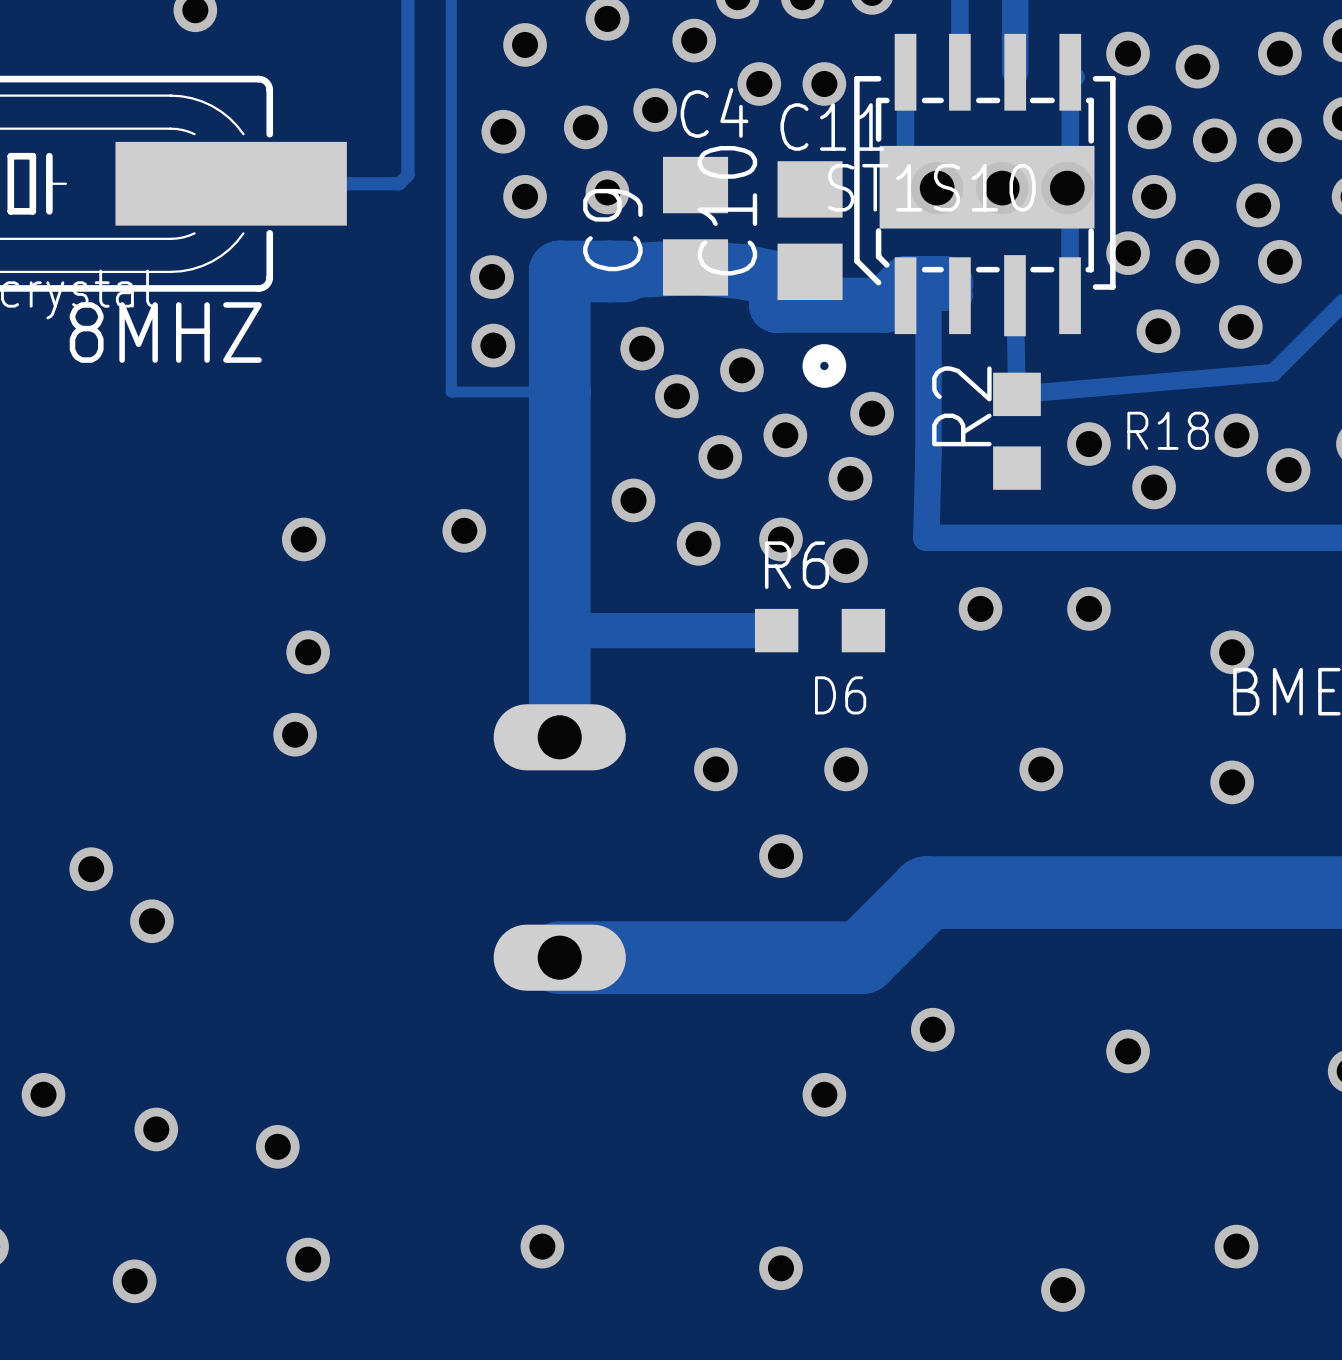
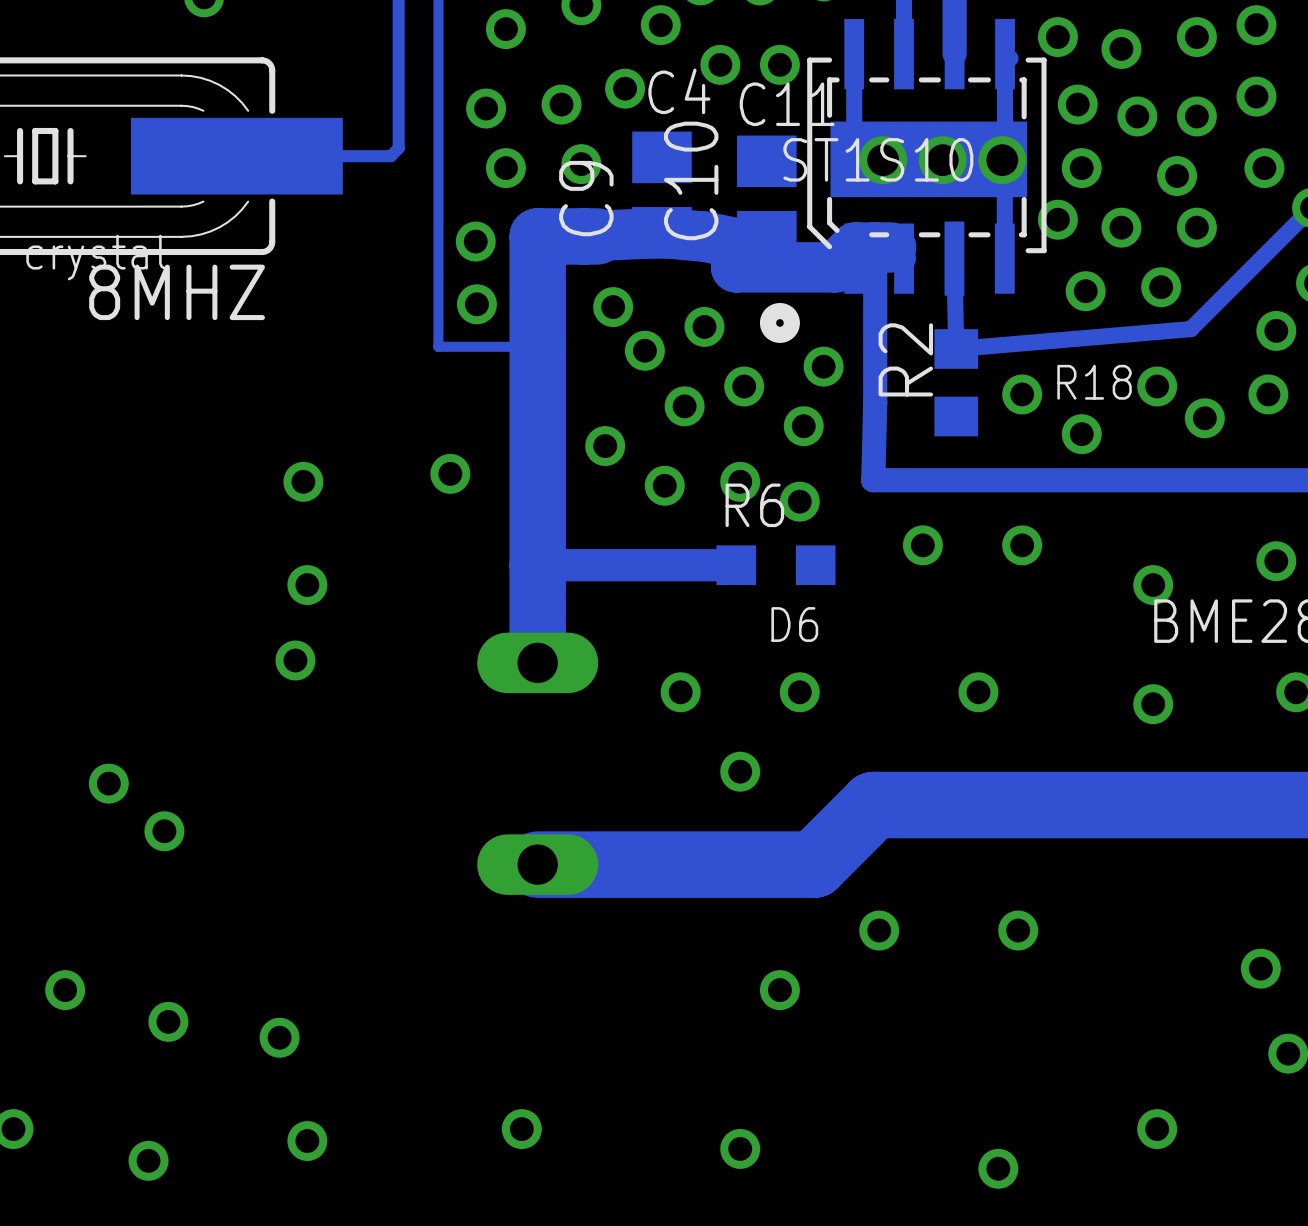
via position: (1128, 1051) -> (1018, 930)

